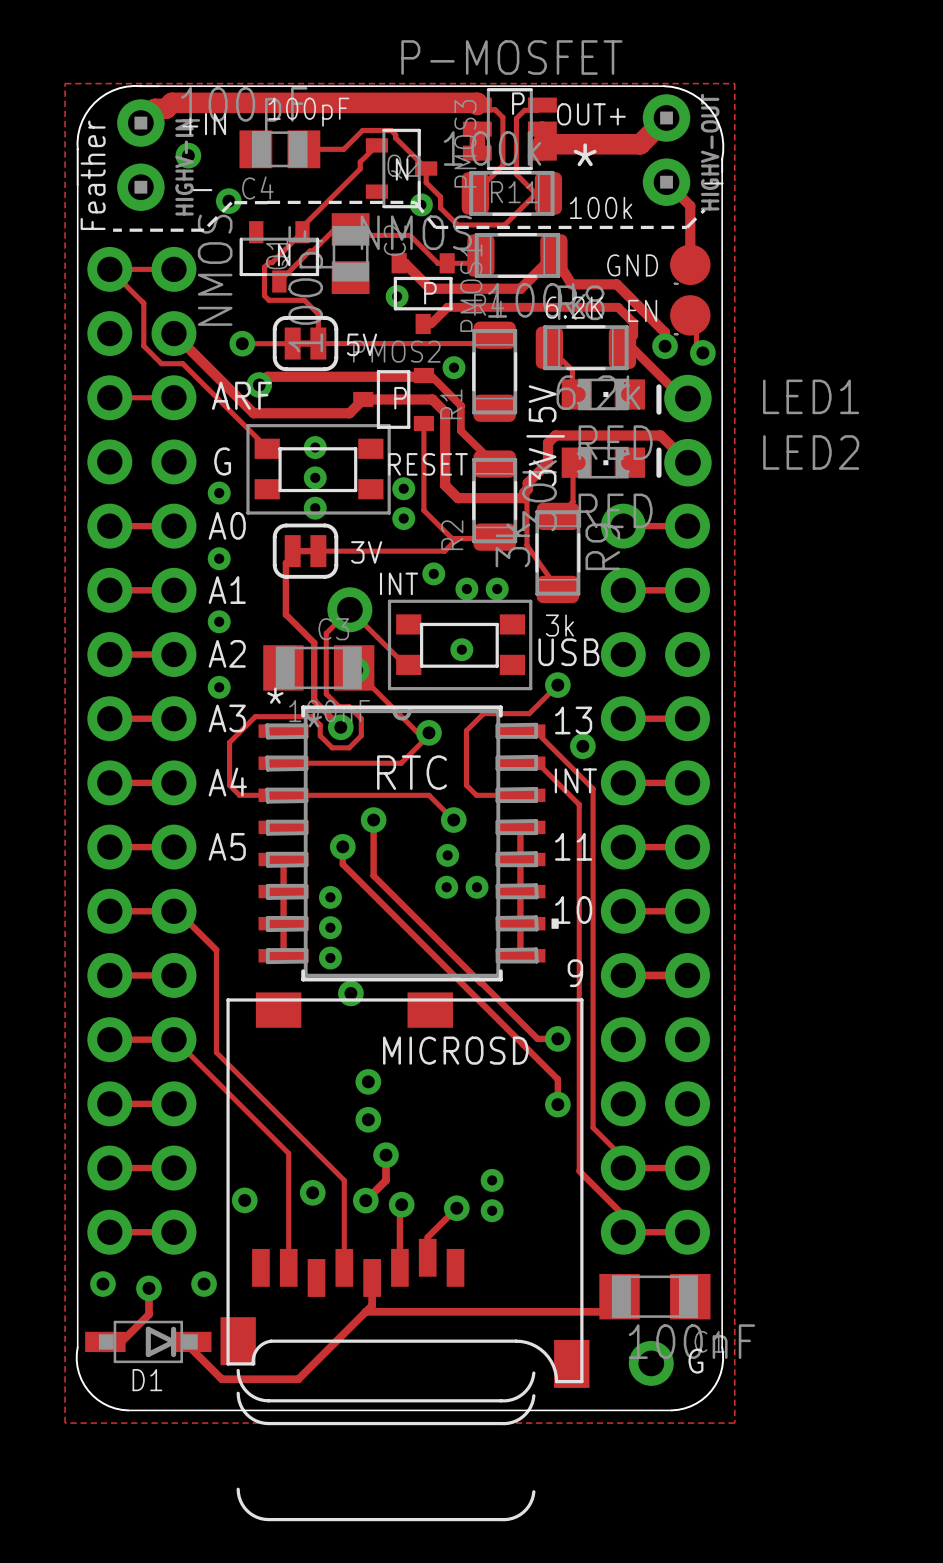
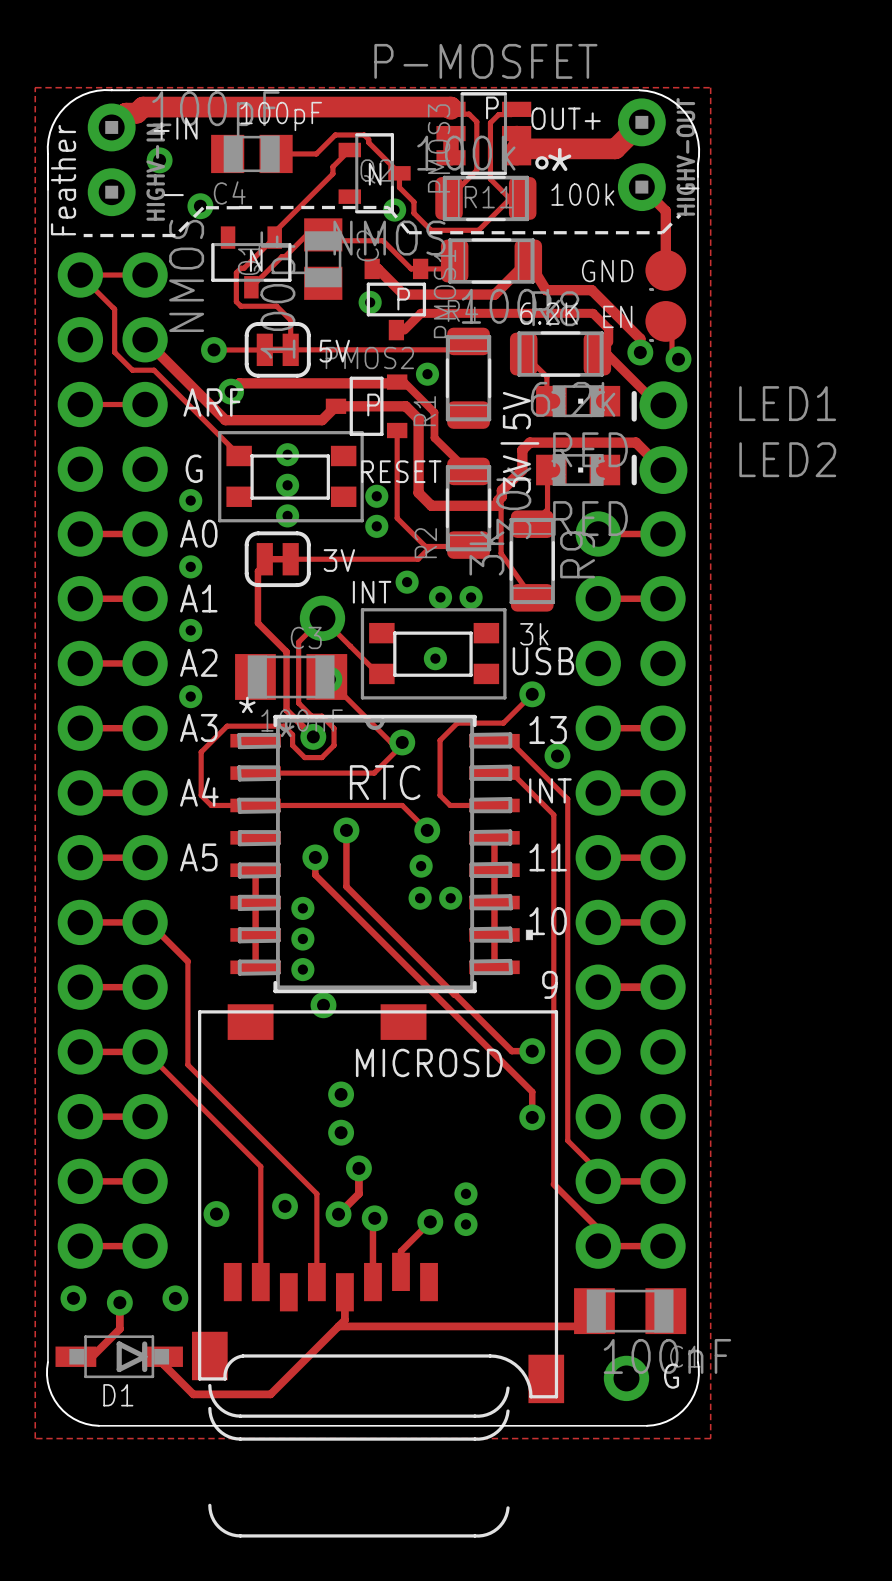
drawing: none -> [535, 156, 549, 170]
text position: 100k (601, 207) -> 100k (582, 194)

